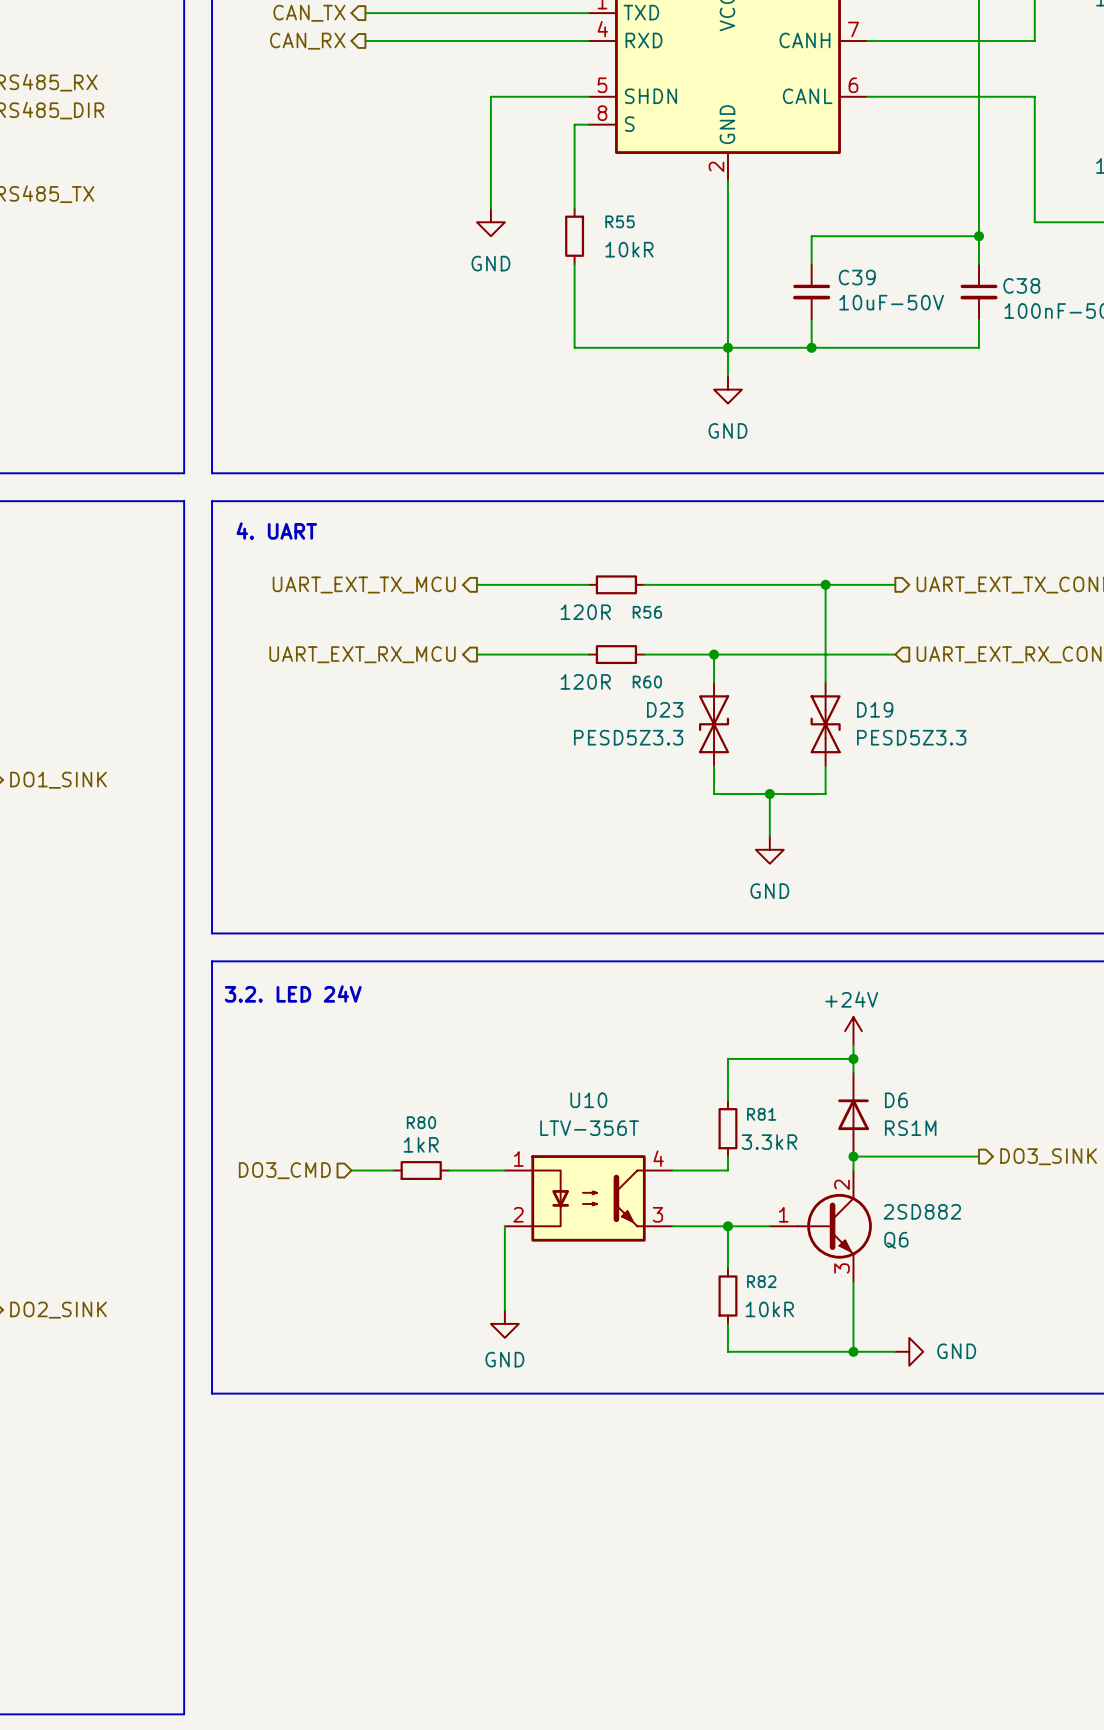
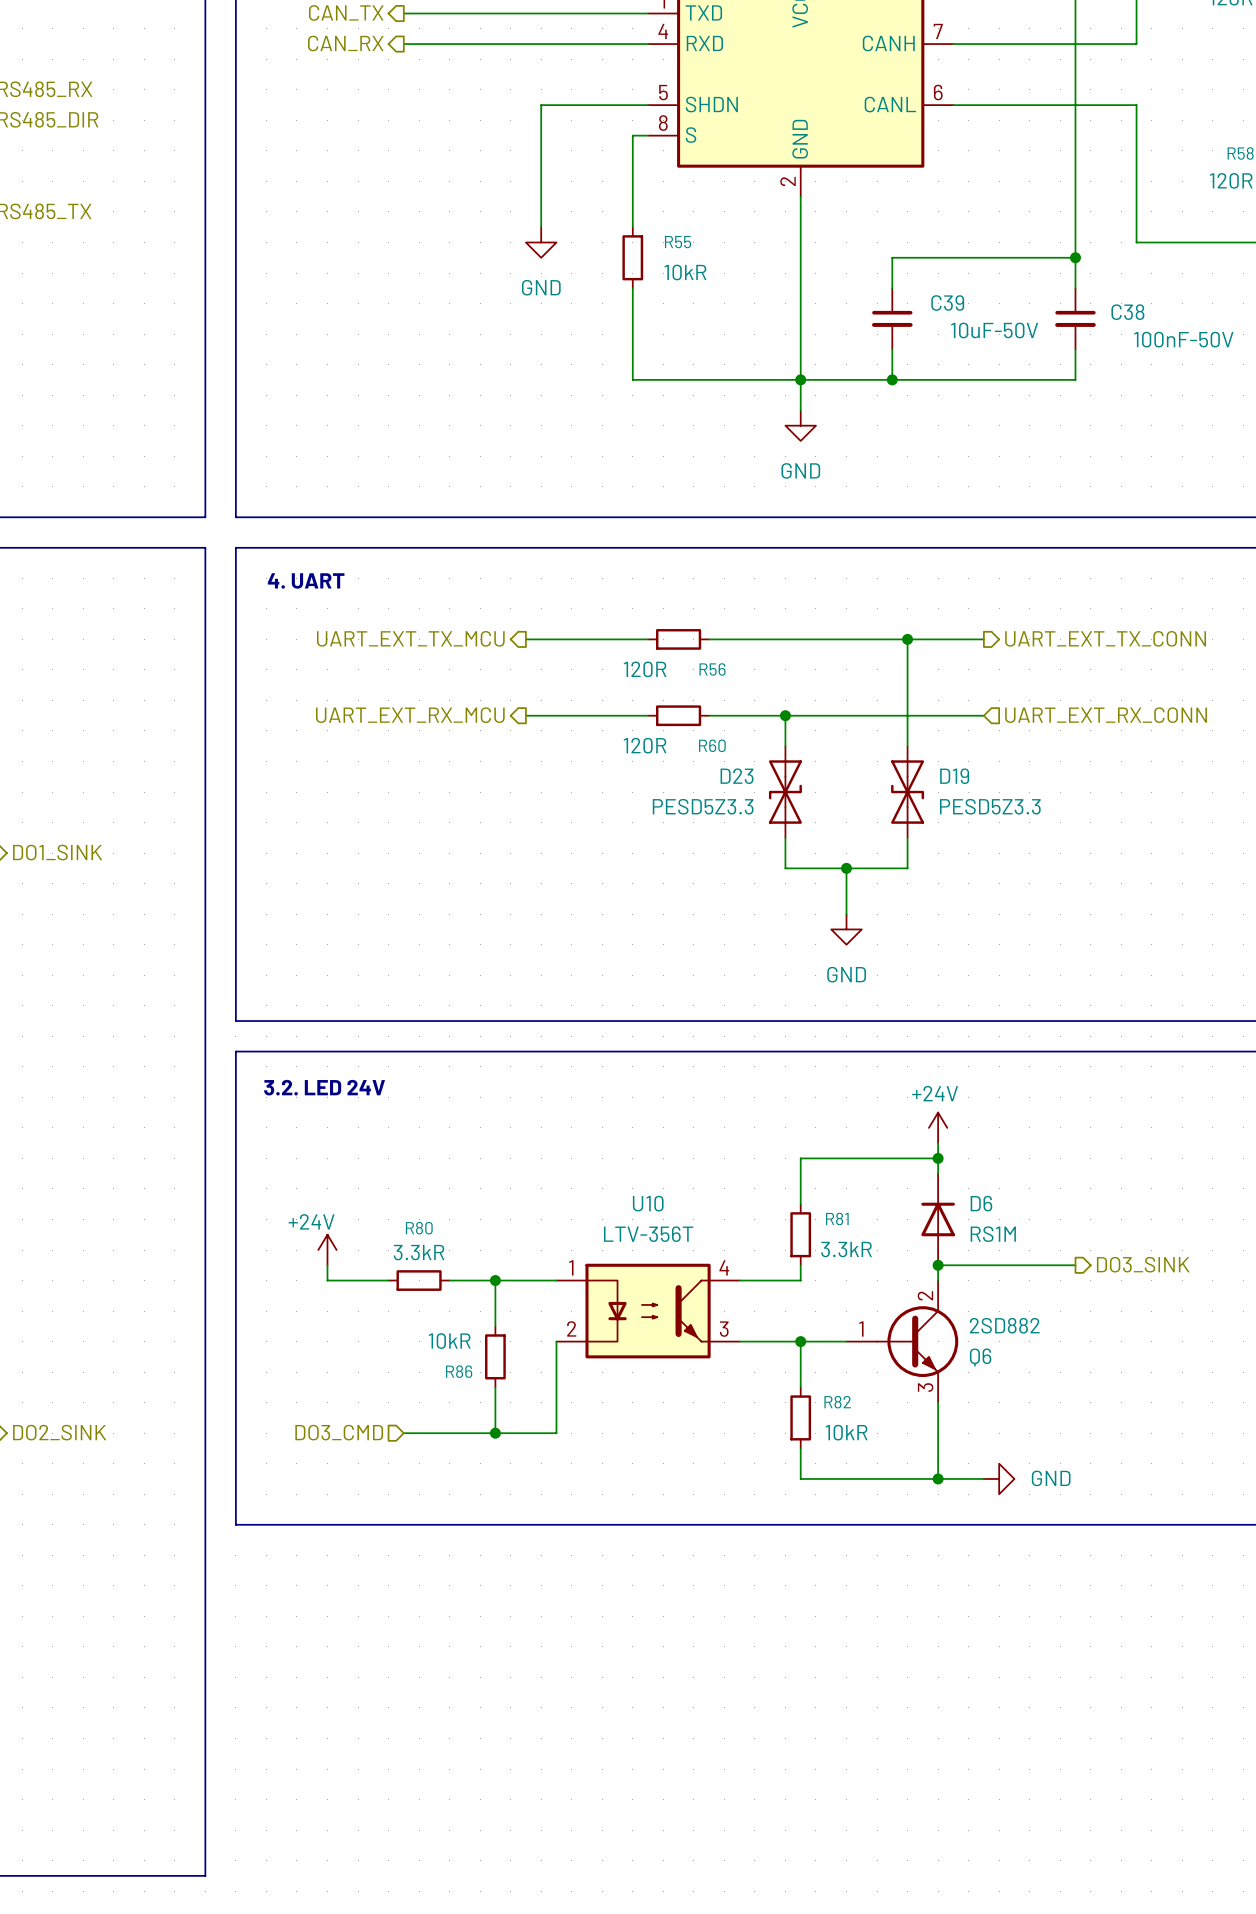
power symbol: none -> +24V (327, 1250)
R80 value: 1kR (421, 1144) -> 3.3kR (419, 1252)
hierarchical label position: DO3_CMD (284, 1170) -> DO3_CMD (339, 1432)
wire: (351, 1170) (393, 1170) -> (388, 1280) (327, 1280) (327, 1265)
wire: none -> (449, 1280) (495, 1280) (495, 1326)
R80 position: (421, 1170) -> (419, 1280)
junction: none -> (495, 1280)
R86: none -> 10kR (495, 1356)
wire: none -> (495, 1387) (495, 1433)
wire: none -> (403, 1433) (556, 1433)
junction: none -> (495, 1433)
power symbol: GND (504, 1323) -> none

